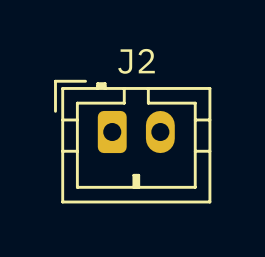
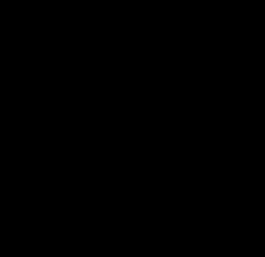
J2: (132, 141) -> none

